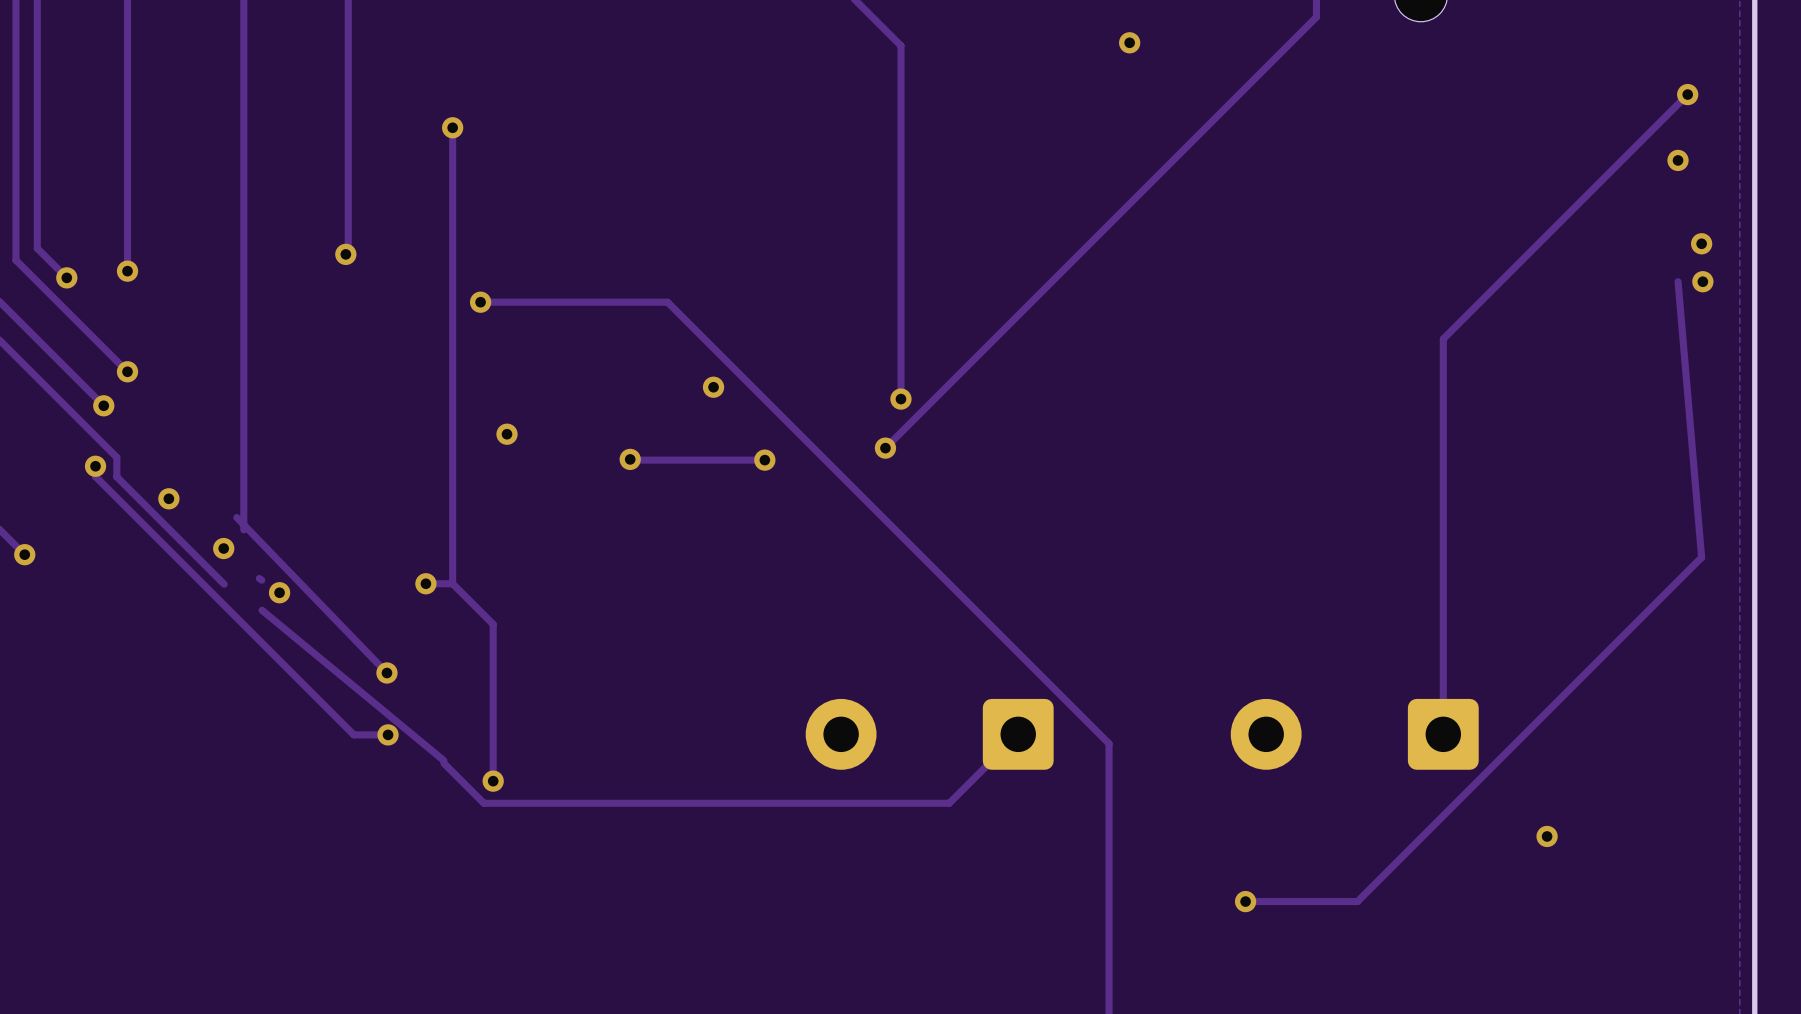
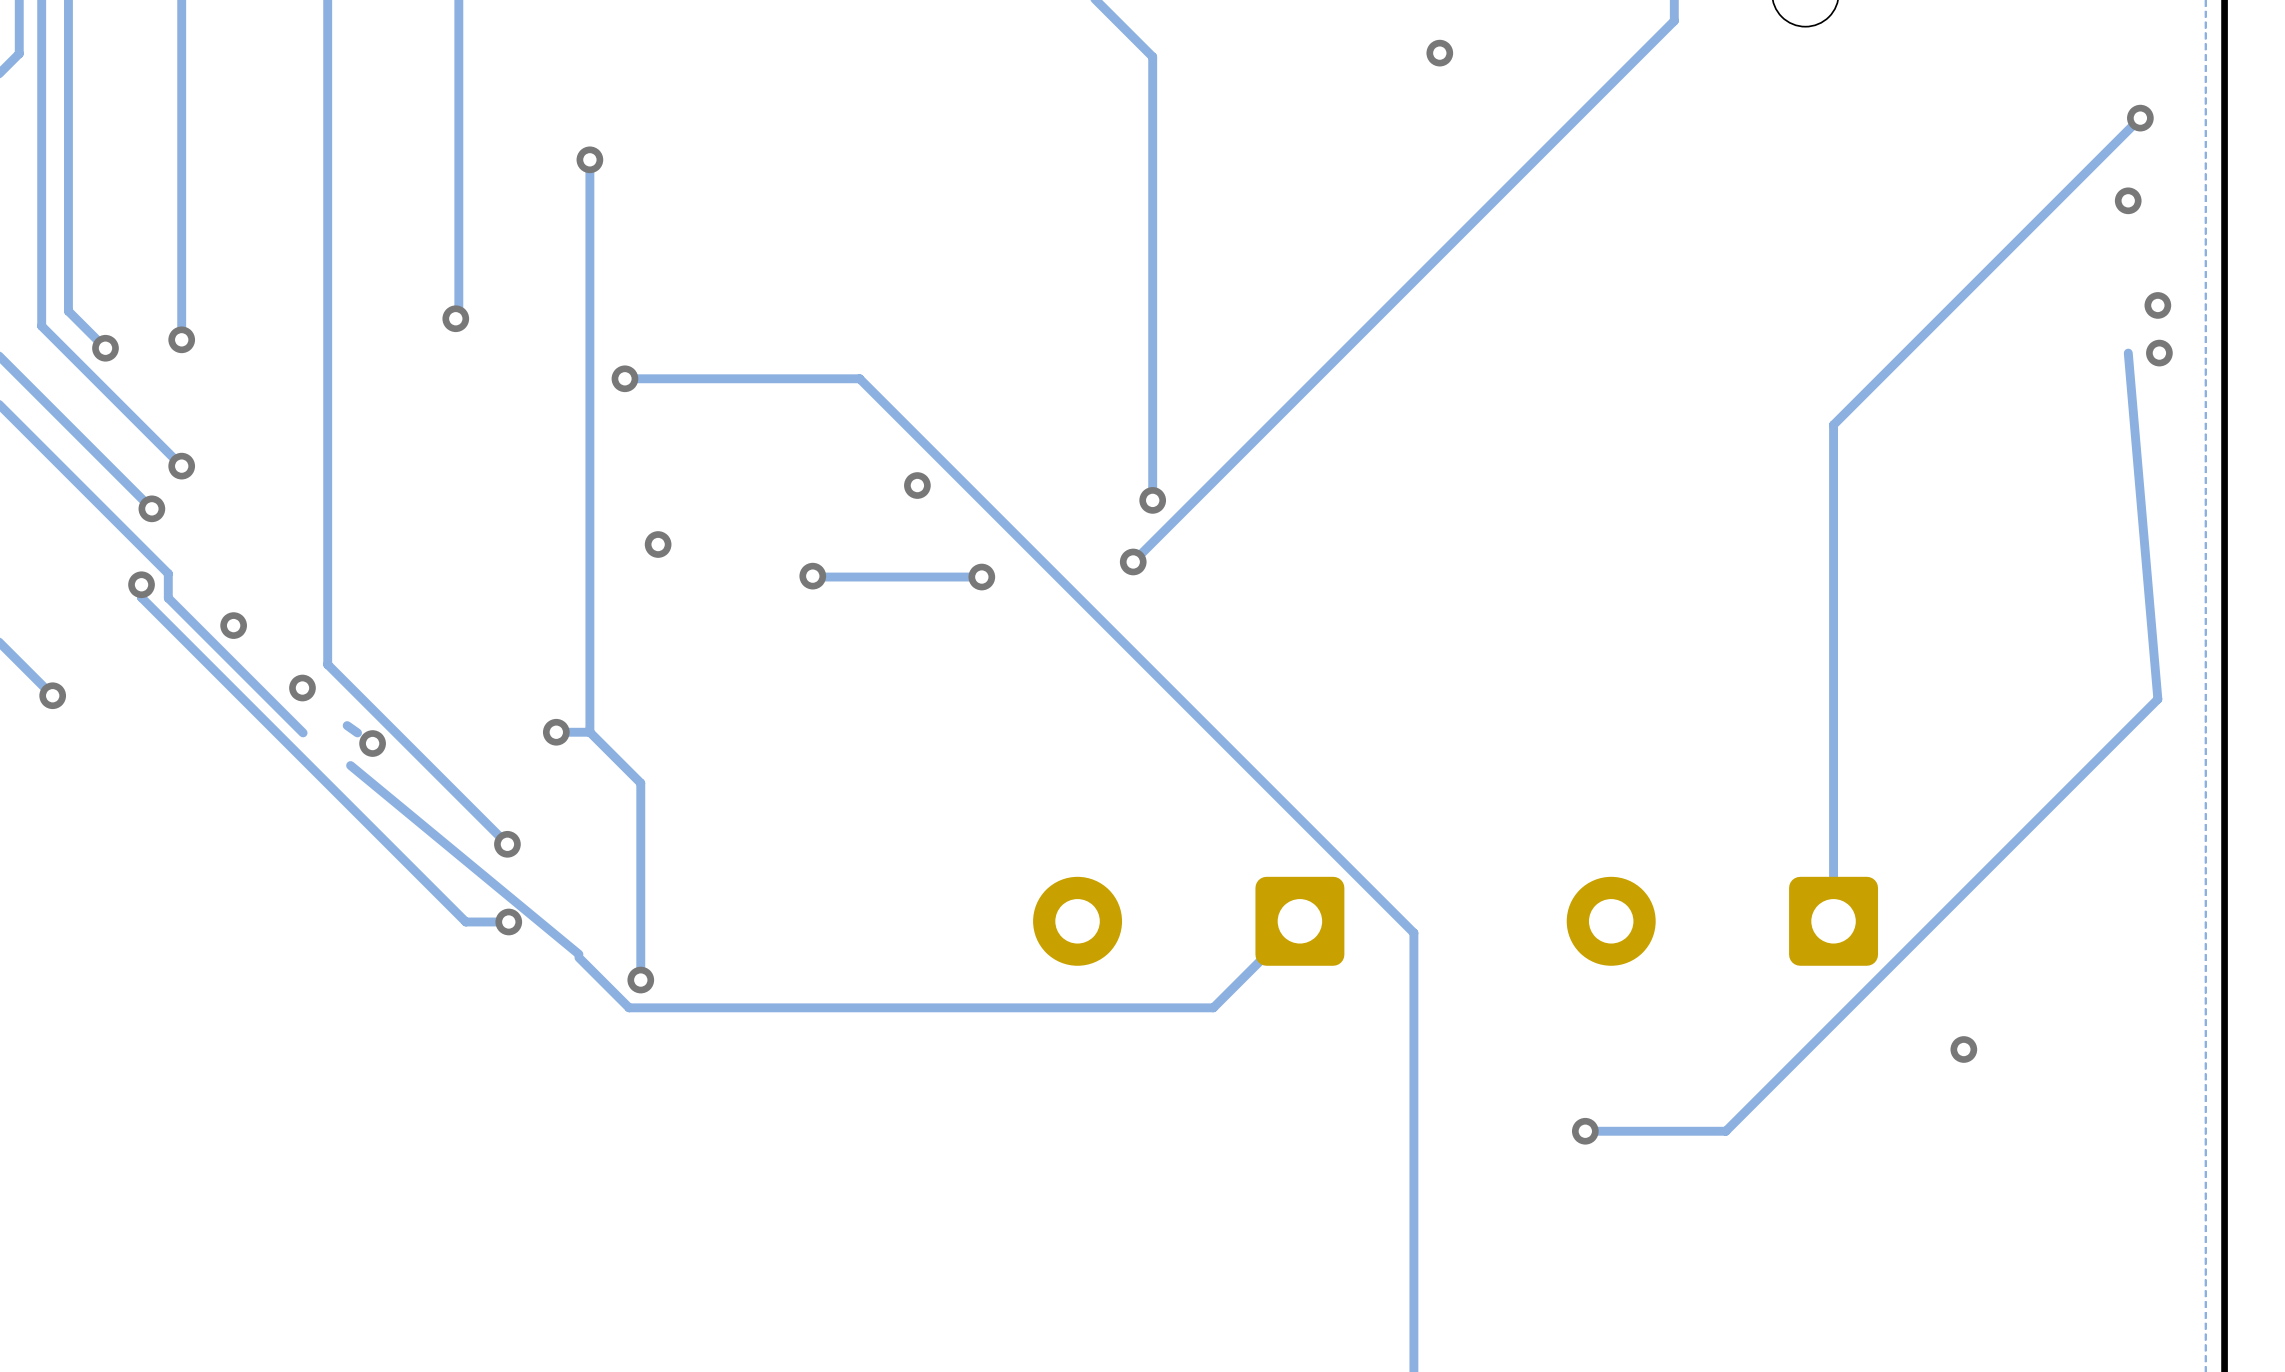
track: (236, 517) (386, 673) -> (327, 664) (507, 844)
track: none -> (350, 727) (357, 732)

